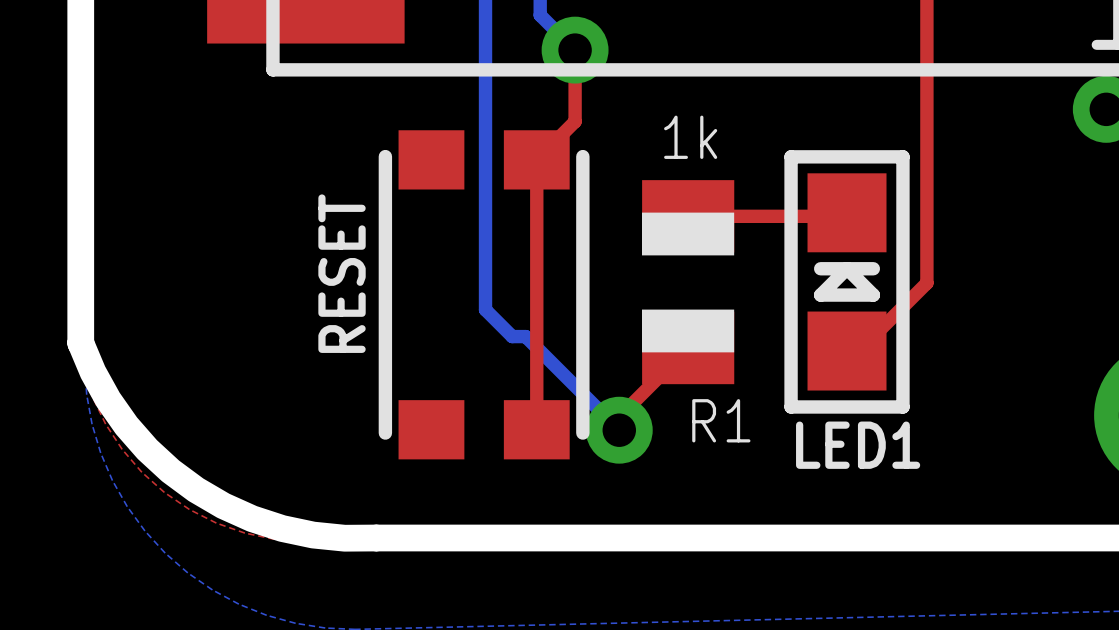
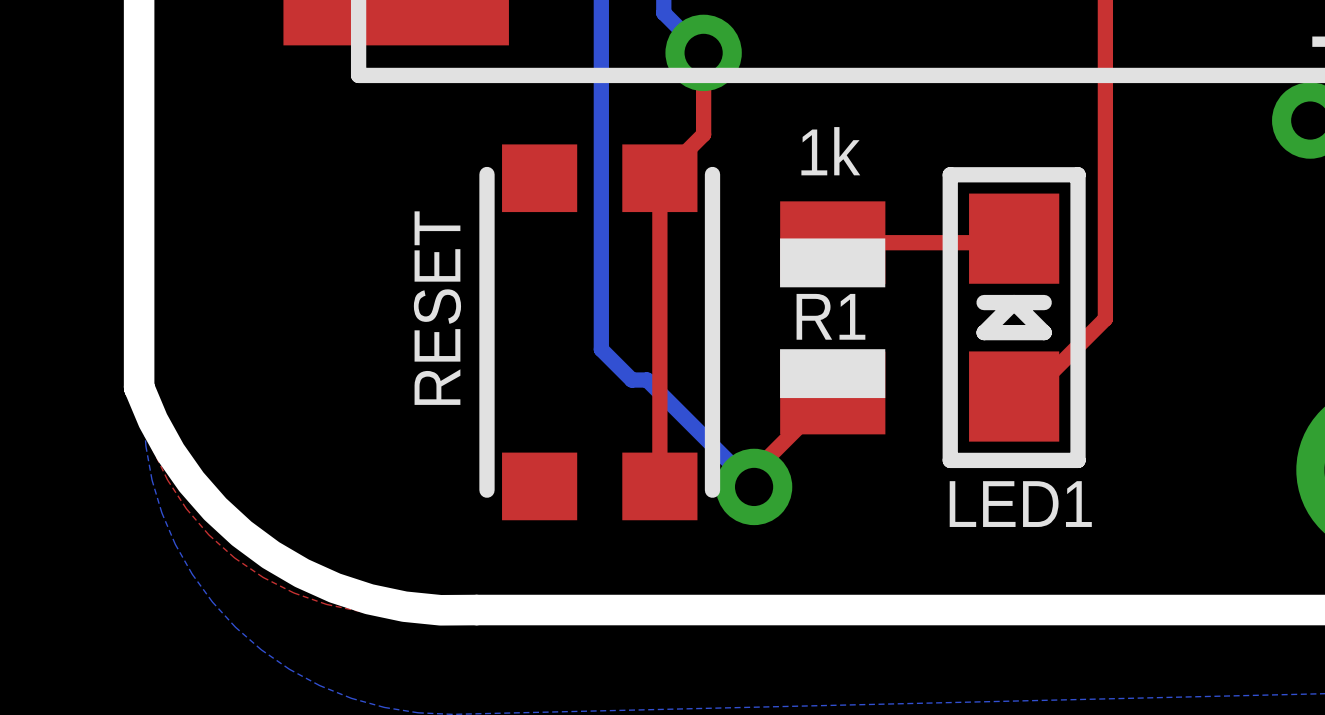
R1 name position: R1 (721, 420) -> R1 (830, 316)

